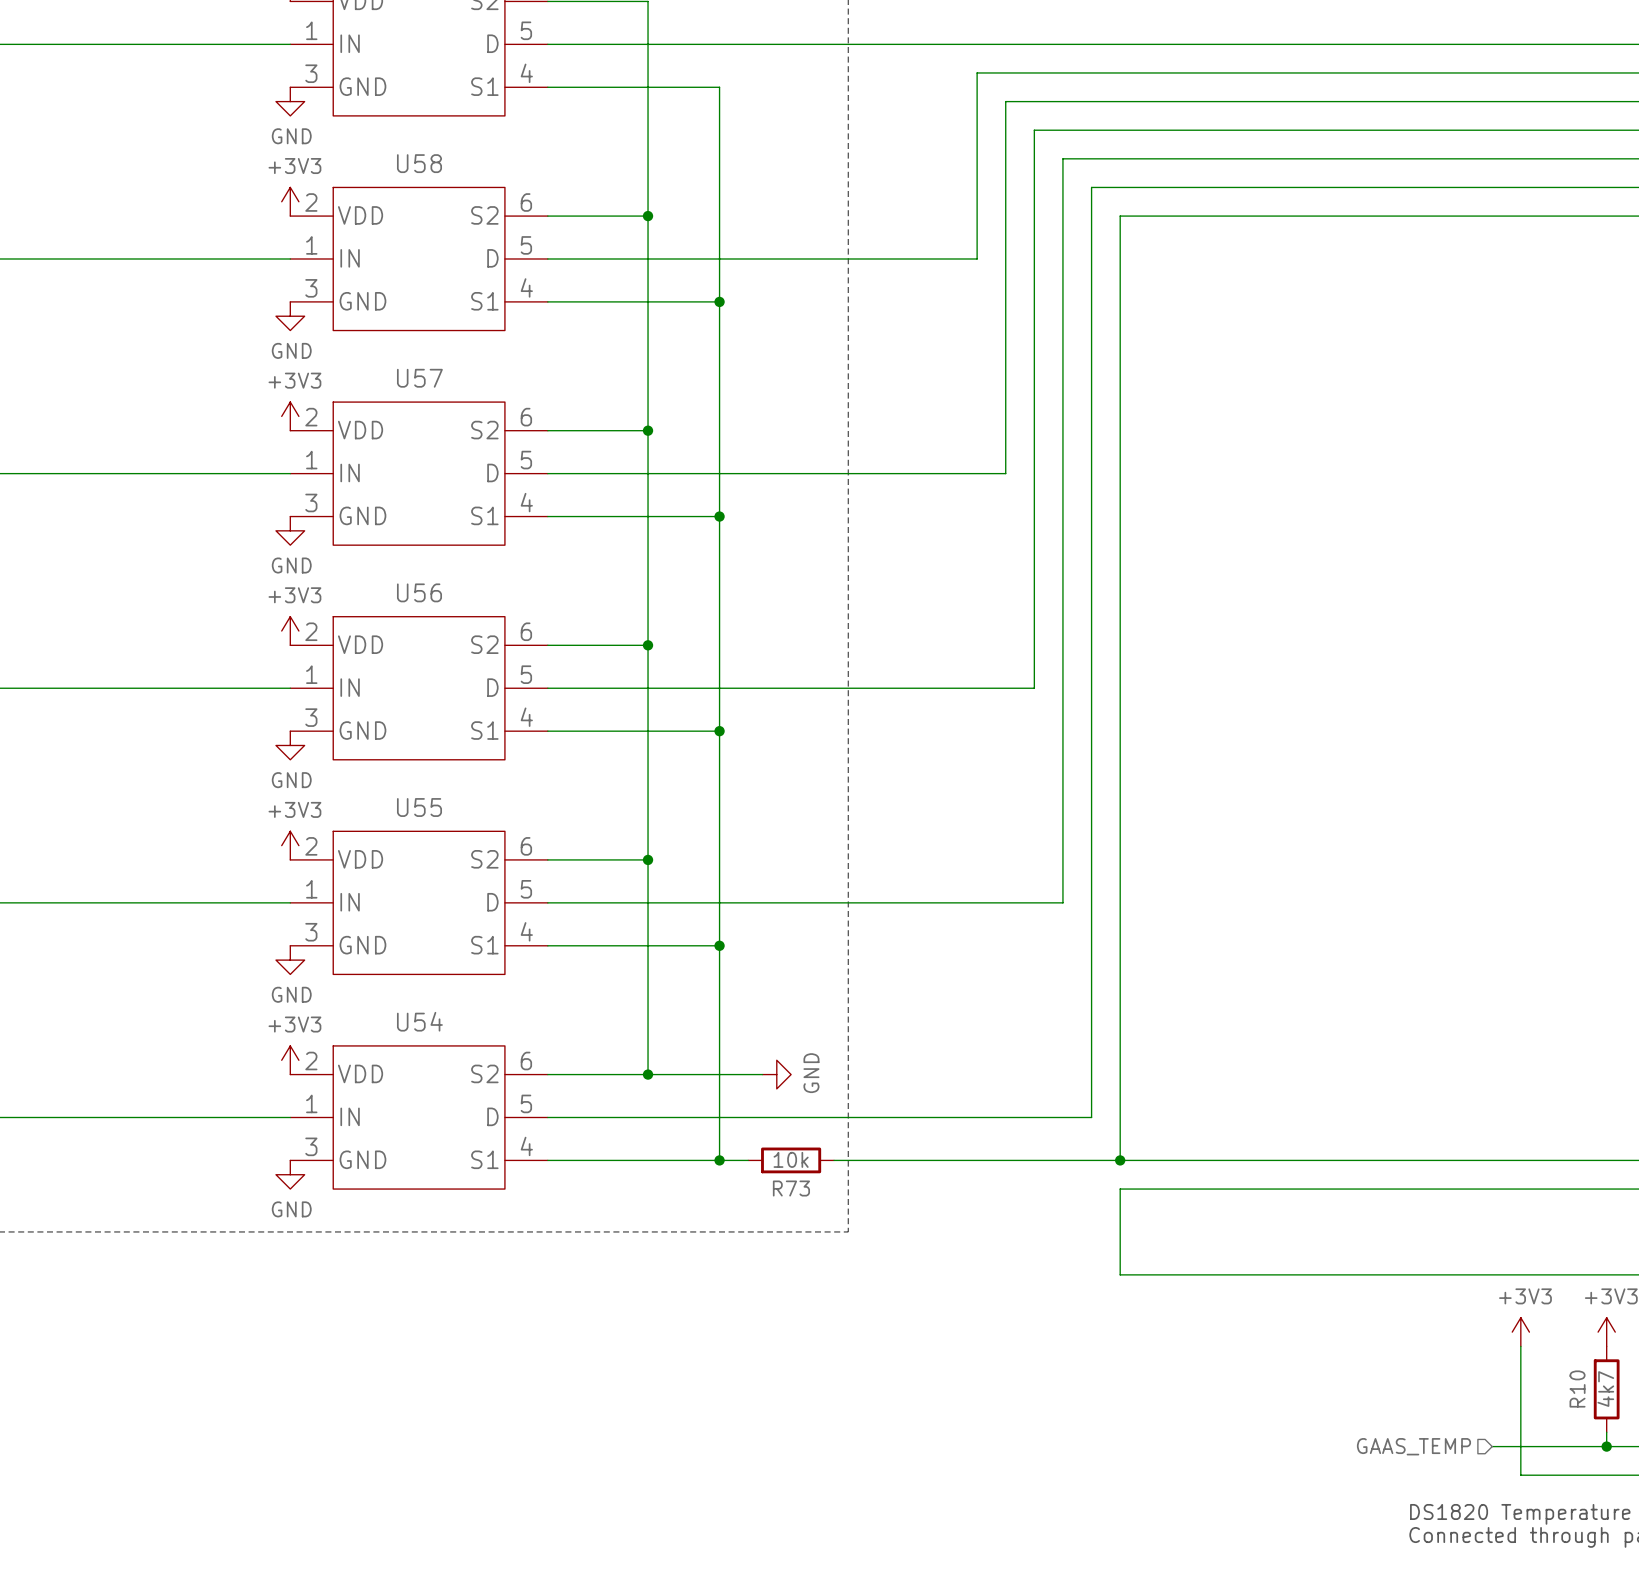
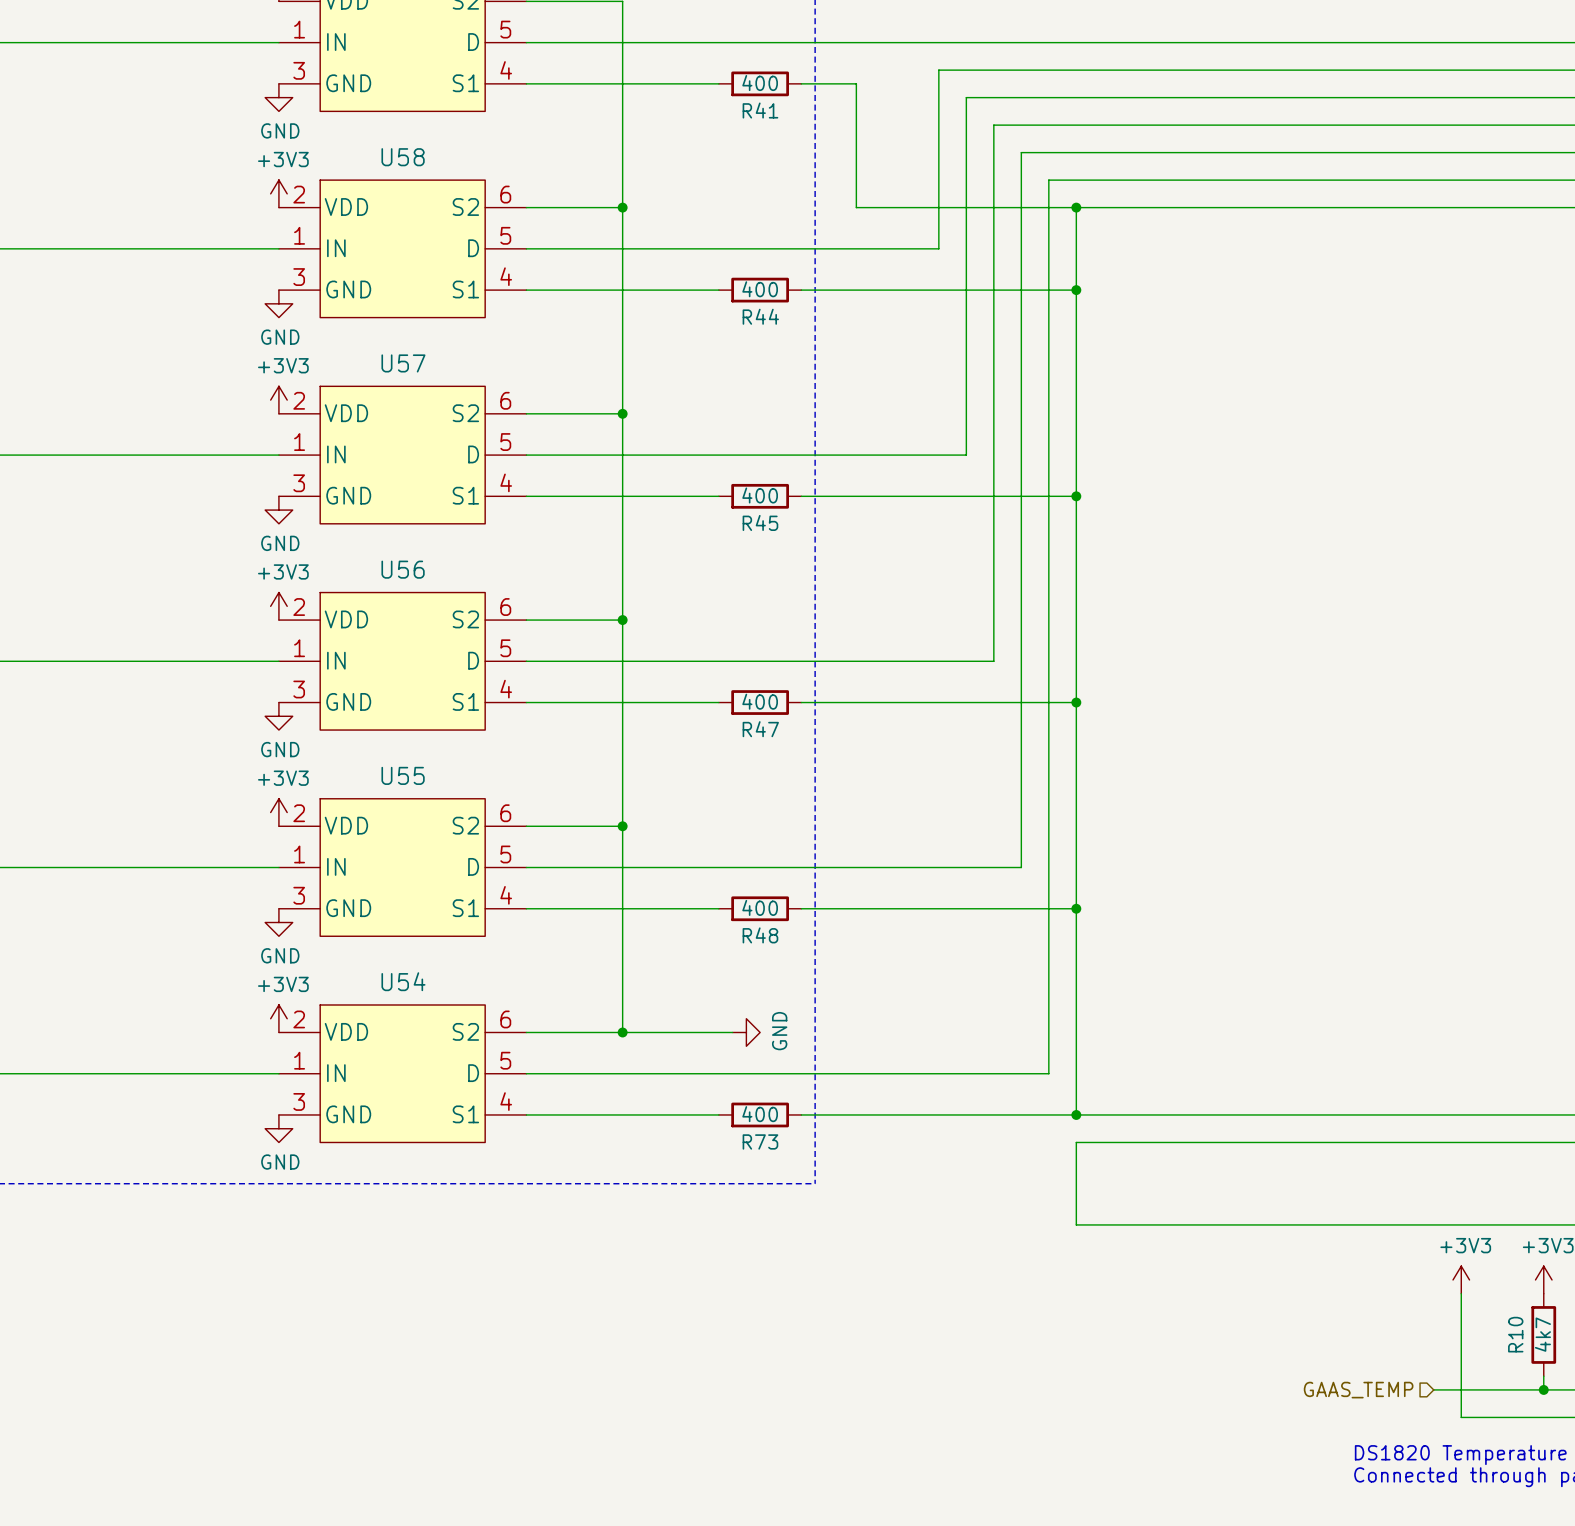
wire: (719, 87) (719, 1160) -> (691, 83) (718, 83)
R41: none -> 400 (760, 83)
wire: none -> (801, 83) (856, 83) (856, 207) (1076, 207)
junction: none -> (1076, 207)
wire: none -> (691, 290) (718, 290)
junction: (719, 301) -> none
R44: none -> 400 (760, 290)
wire: none -> (801, 290) (1076, 290)
junction: none -> (1076, 290)
wire: none -> (691, 496) (718, 496)
junction: (719, 516) -> none
R45: none -> 400 (760, 496)
wire: none -> (801, 496) (1076, 496)
junction: none -> (1076, 496)
wire: none -> (691, 702) (718, 702)
junction: (719, 731) -> none
R47: none -> 400 (760, 702)
wire: none -> (801, 702) (1076, 702)
junction: none -> (1076, 702)
wire: none -> (691, 908) (718, 908)
junction: (719, 945) -> none
R48: none -> 400 (760, 908)
wire: none -> (801, 908) (1076, 908)
junction: none -> (1076, 908)
R73 value: 10k (791, 1159) -> 400 (760, 1114)
junction: (719, 1160) -> none

